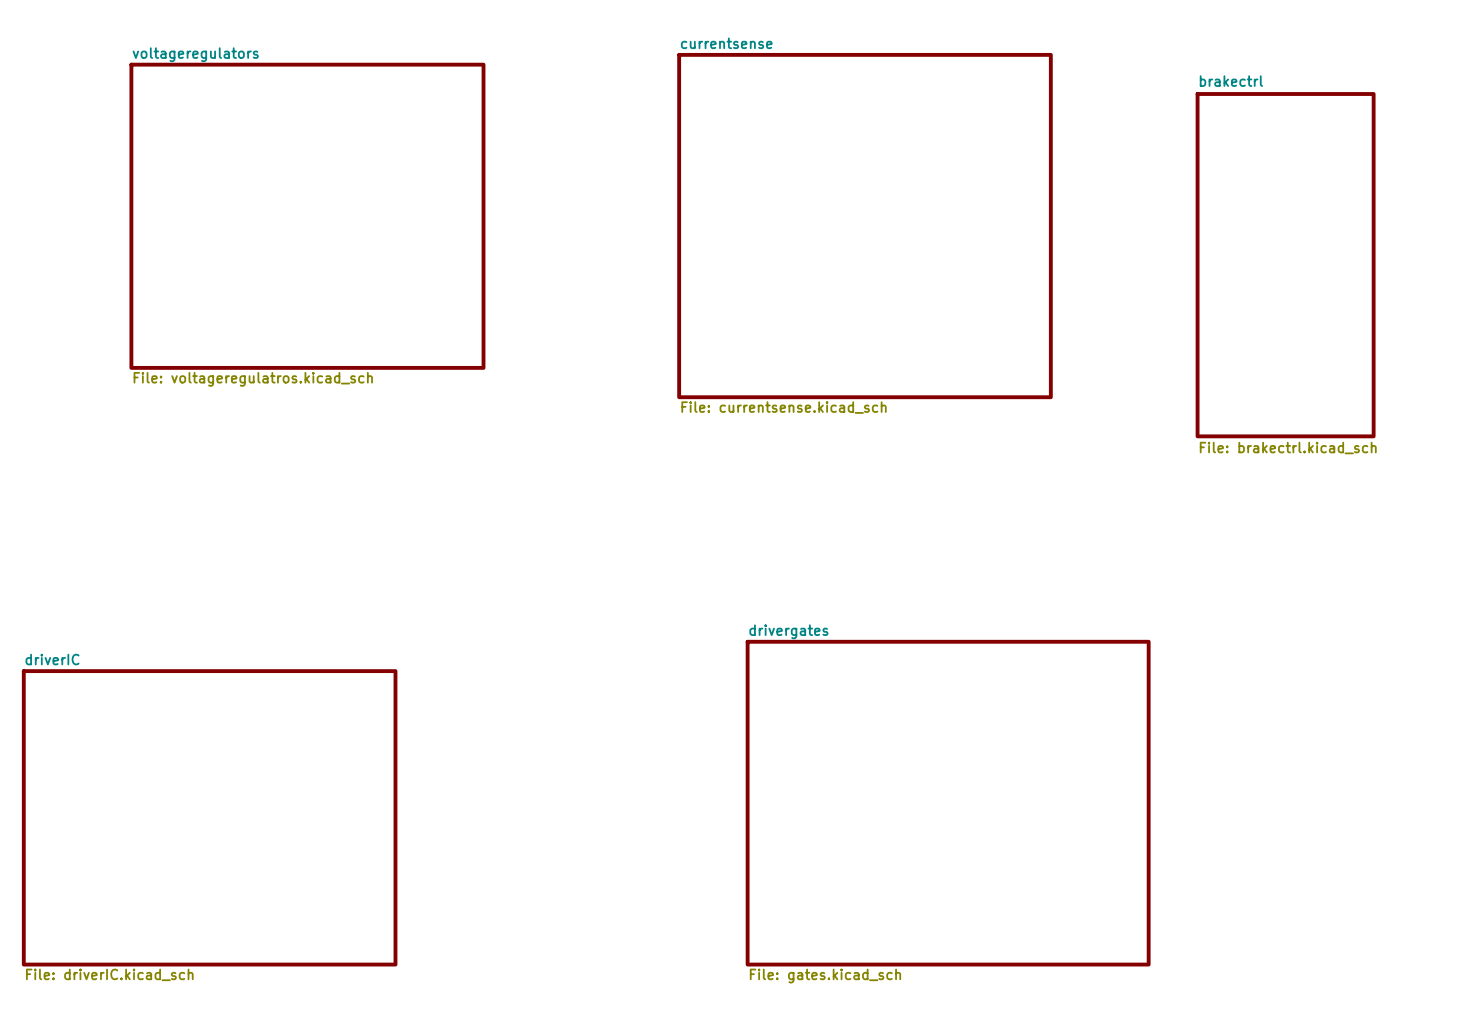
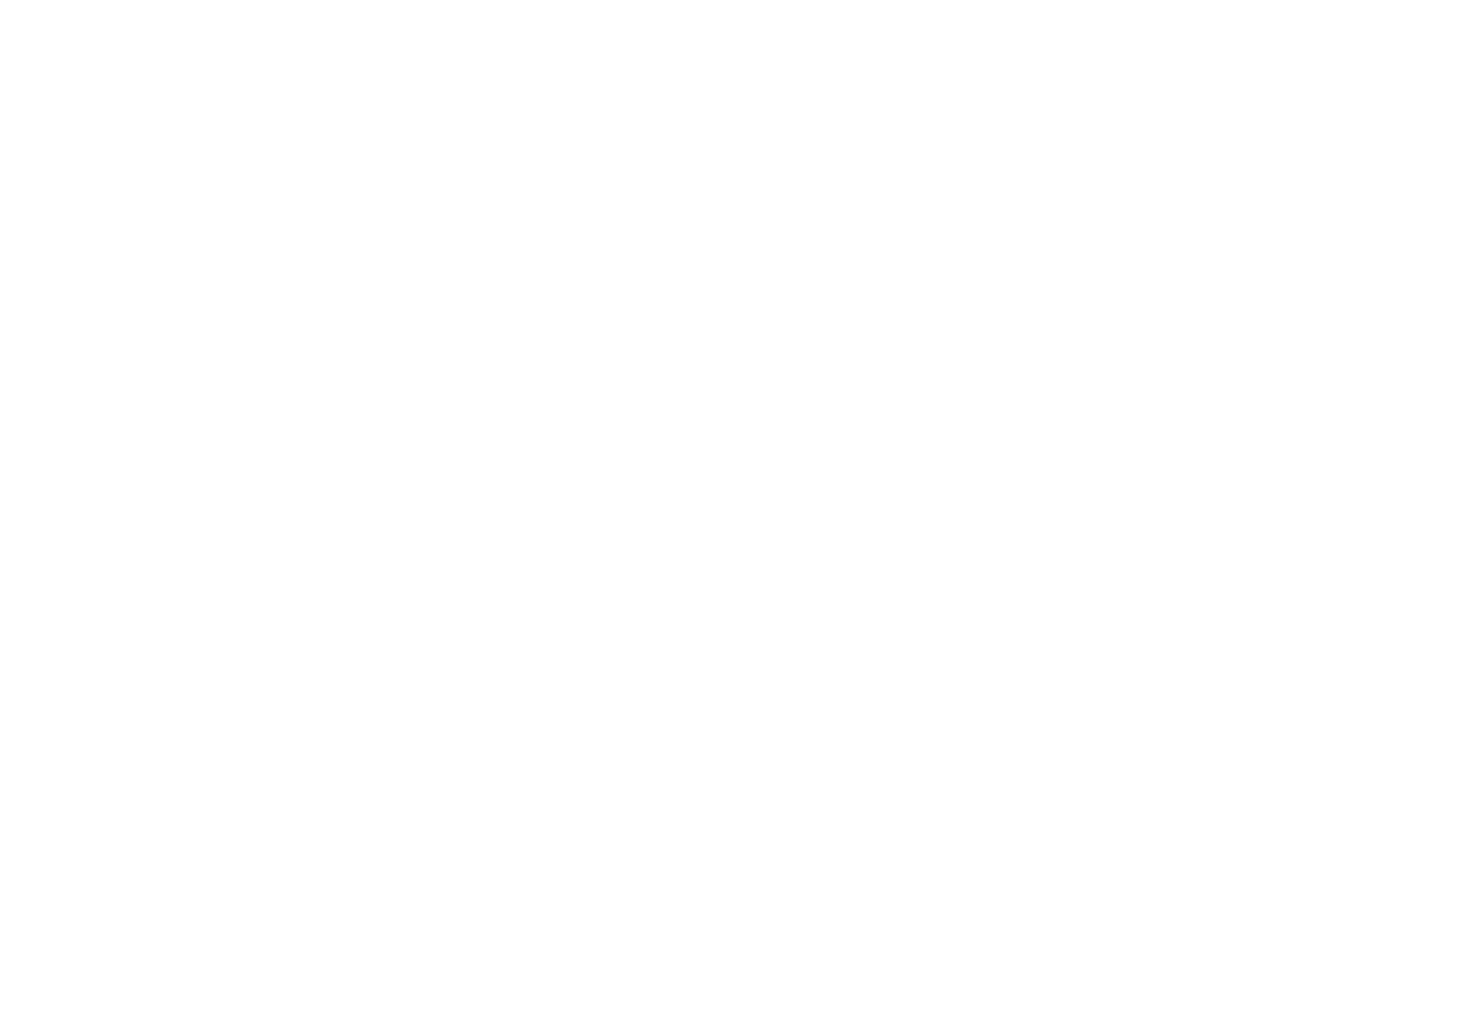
sheet voltageregulators: File: voltageregulatros.kicad_sch (307, 216) -> none
sheet currentsense: File: currentsense.kicad_sch (864, 226) -> none
sheet brakectrl: File: brakectrl.kicad_sch (1285, 265) -> none
sheet drivergates: File: gates.kicad_sch (948, 803) -> none
sheet driverIC: File: driverIC.kicad_sch (209, 817) -> none

